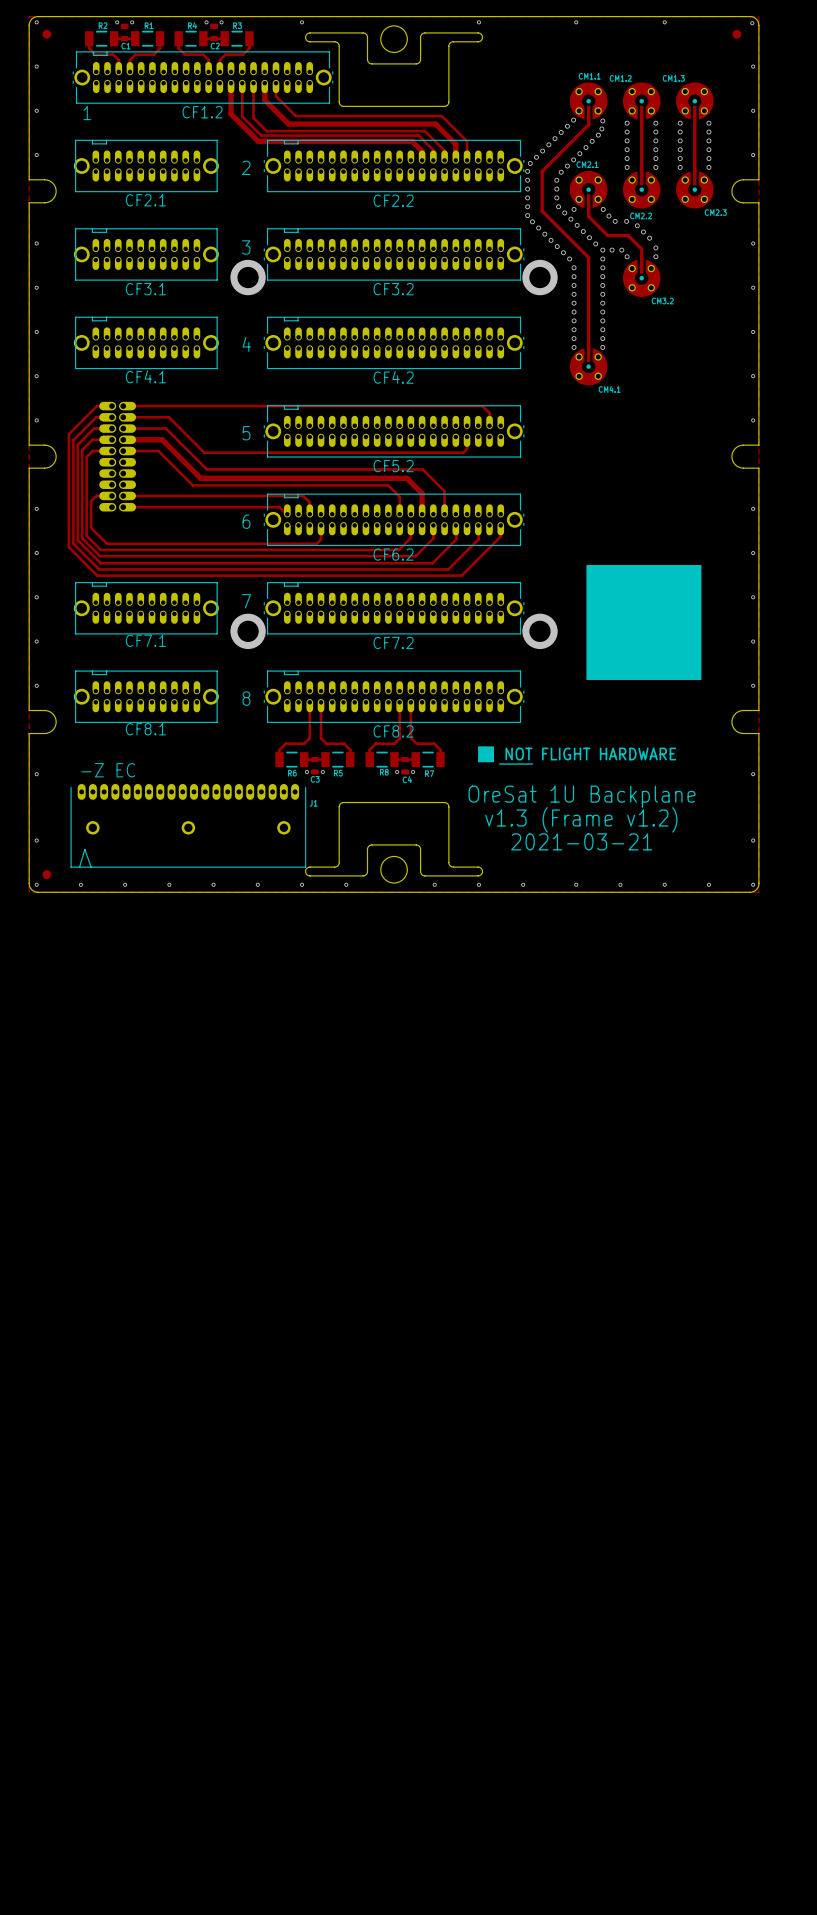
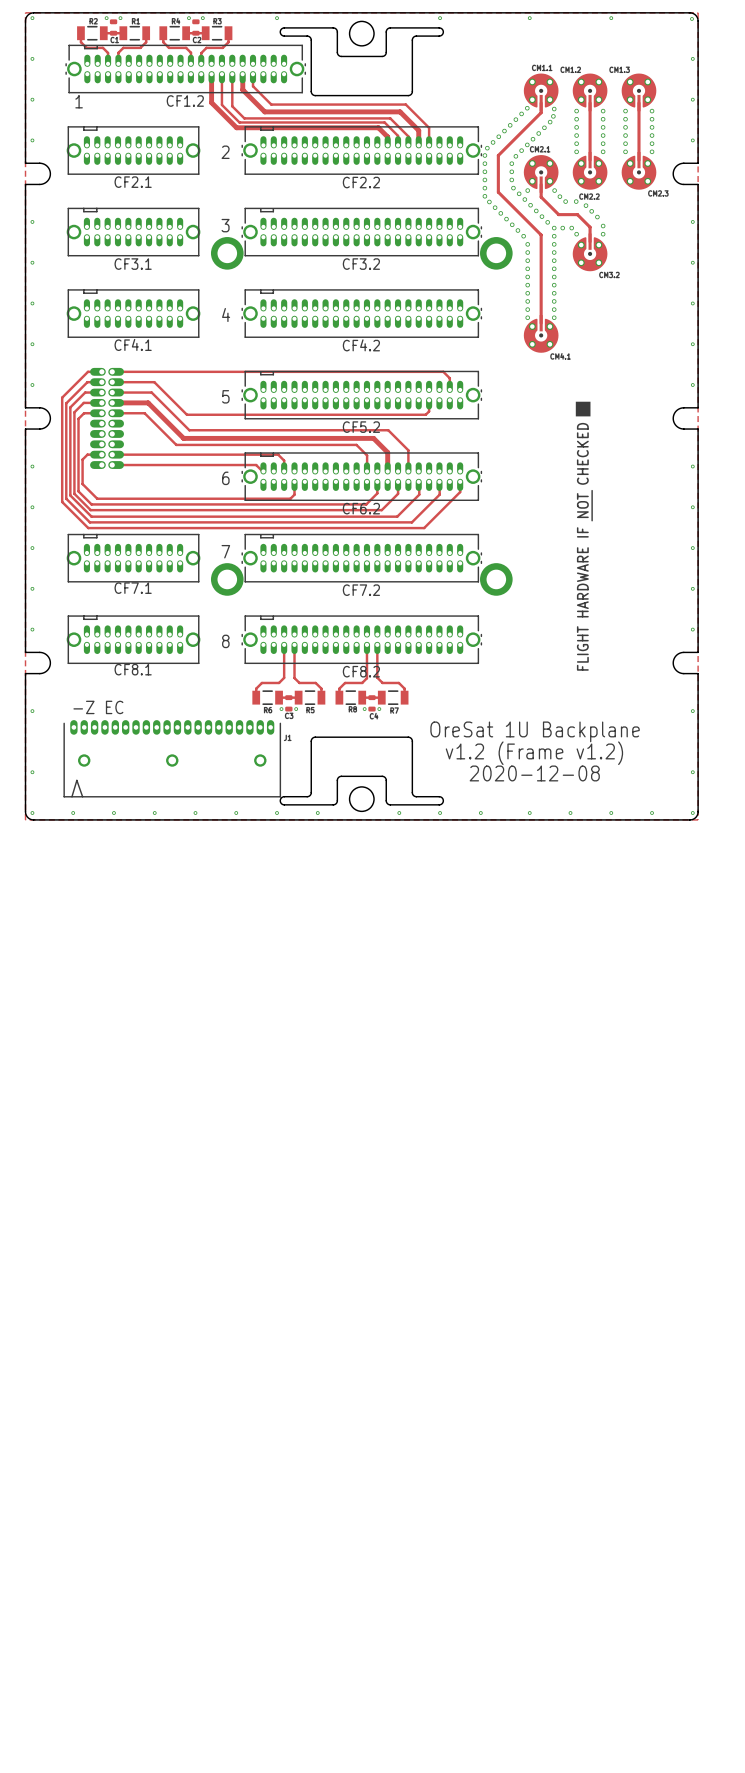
part: (46, 34) -> none
part: (736, 34) -> none
drawing: none -> [575, 401, 593, 522]
drawing: [586, 565, 702, 681] -> none
drawing: [478, 746, 534, 765] -> none
text: v1.3 (Frame v1.2) (581, 819) -> v1.2 (Frame v1.2) (534, 753)
text: 2021-03-21 (581, 841) -> 2020-12-08 (534, 773)
part: (46, 874) -> none

